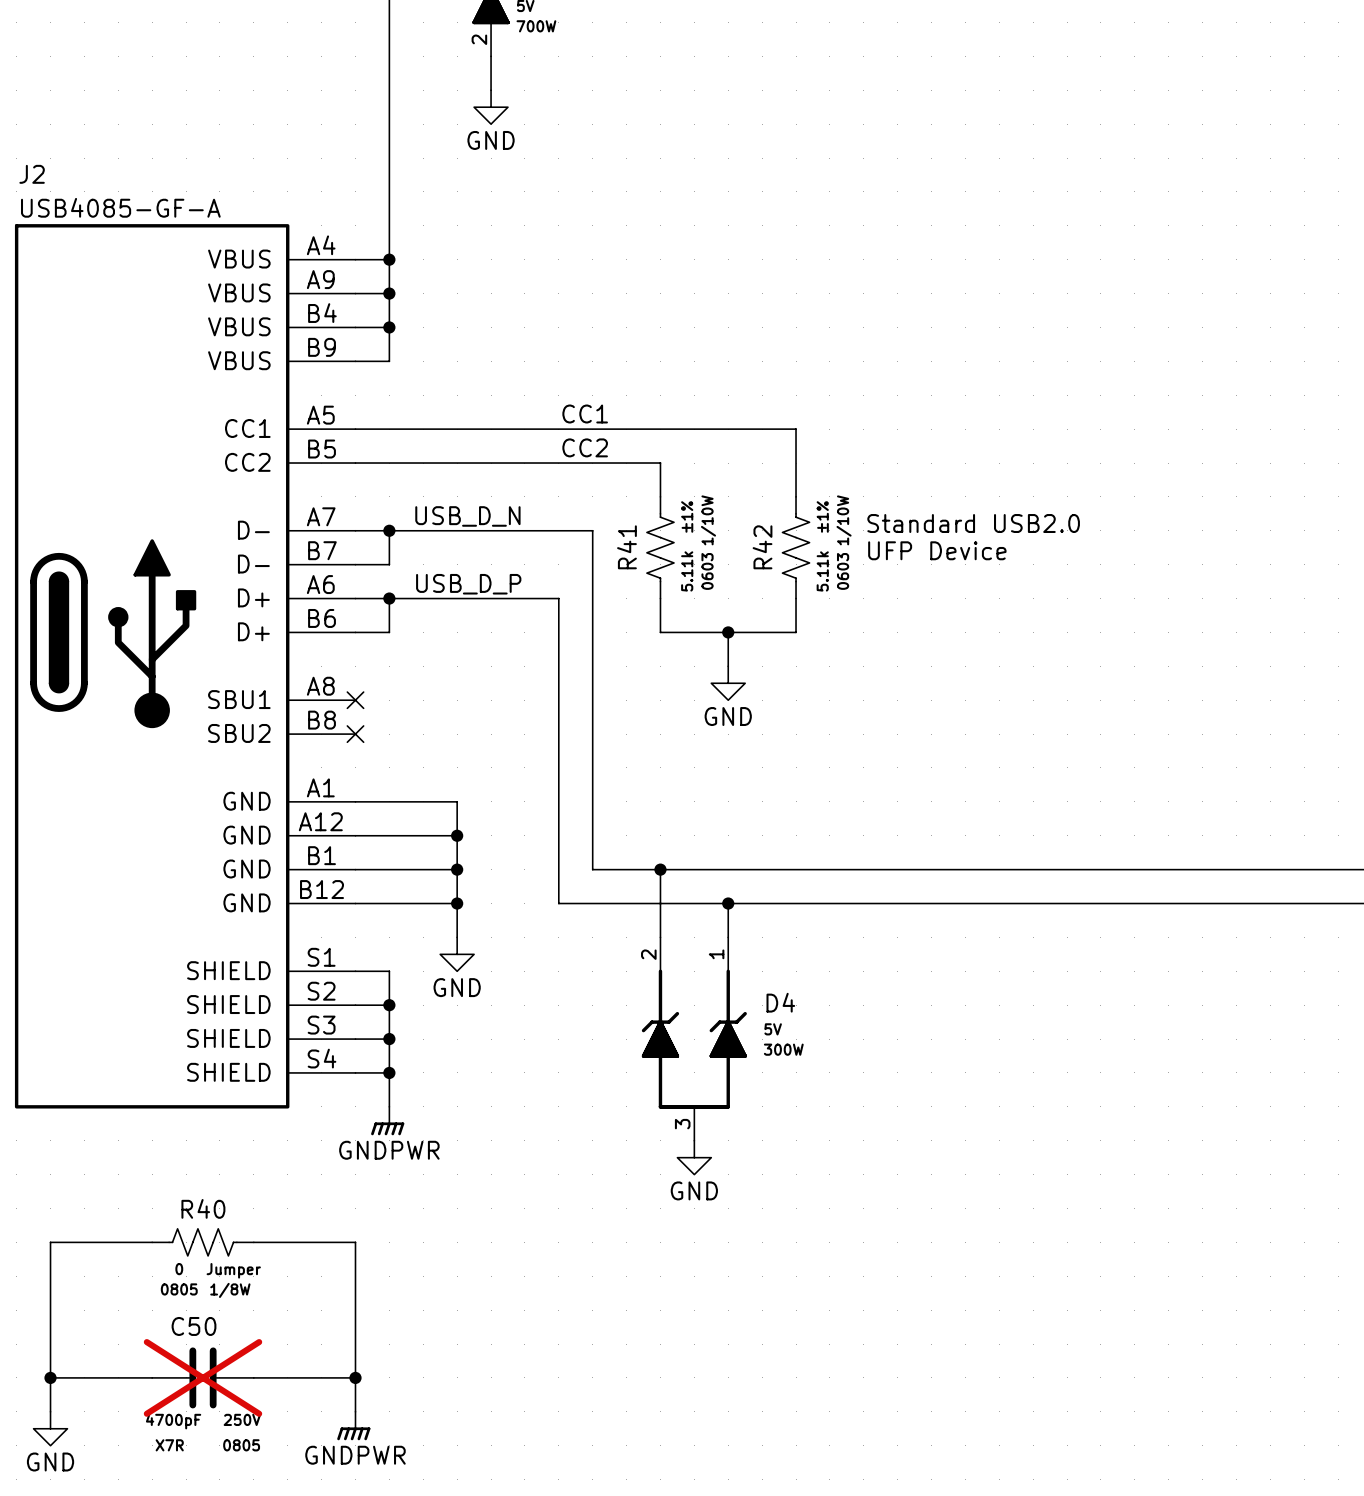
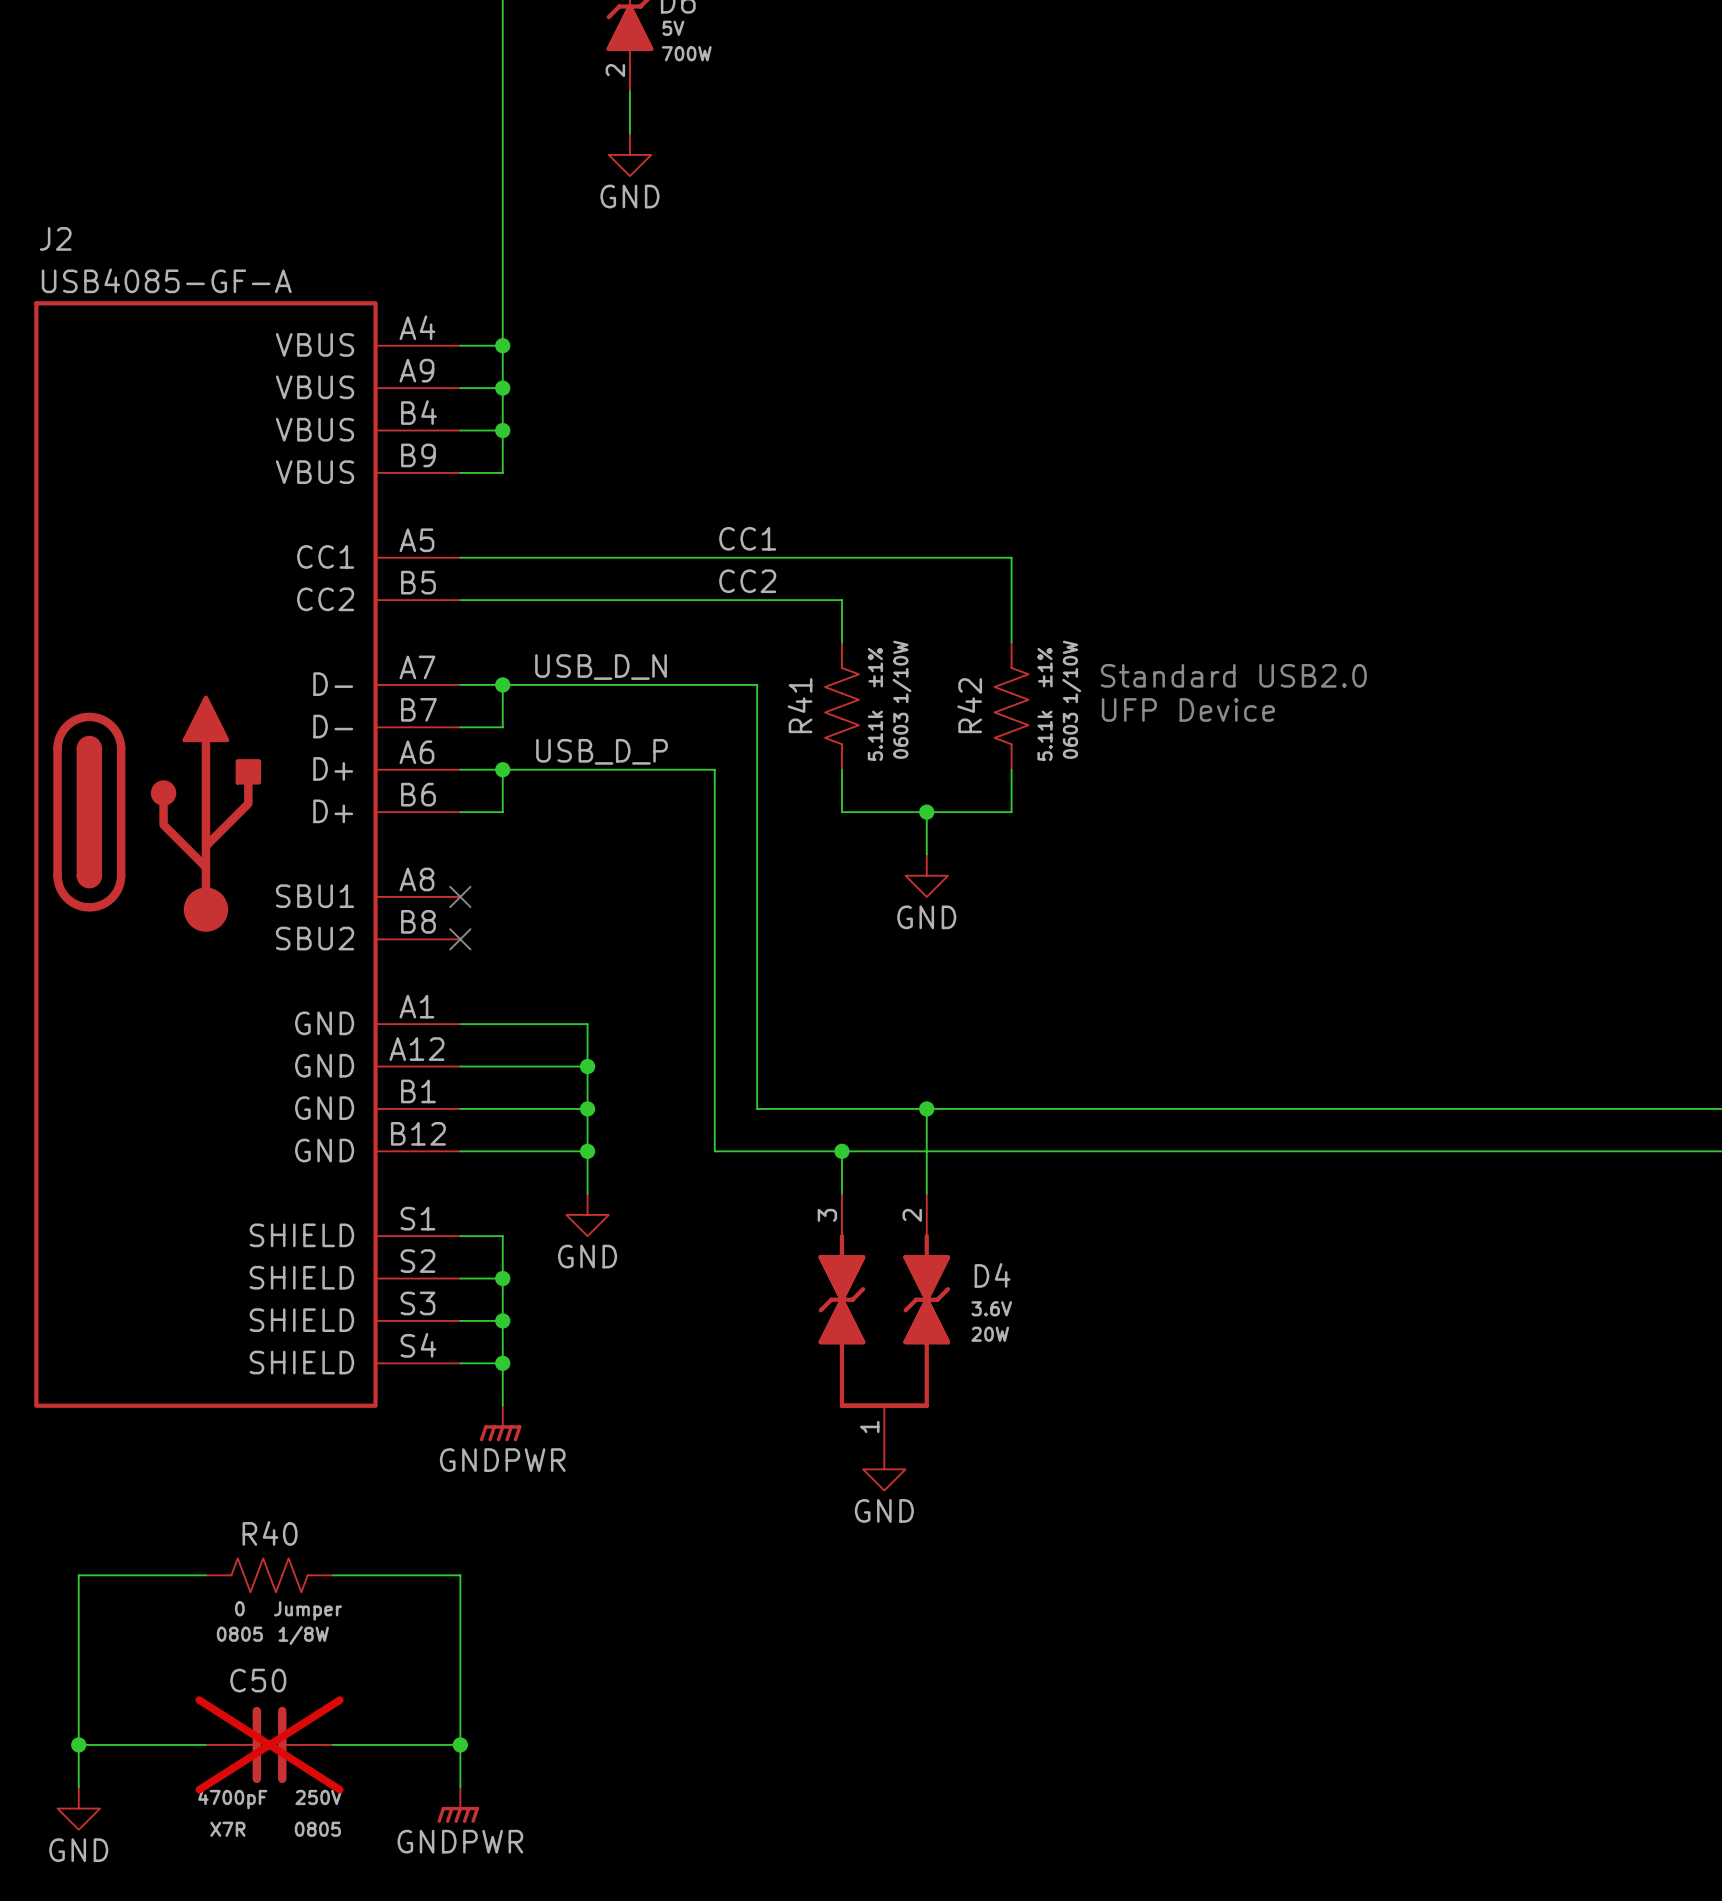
wire: (660, 869) (660, 903) -> (926, 1108) (926, 1151)
junction: (660, 869) -> none
junction: none -> (926, 1108)
junction: none -> (841, 1151)
junction: (728, 903) -> none
D4 symbol: [641, 937, 747, 1141] -> [818, 1193, 951, 1449]
D4 text: 5V (773, 1029) -> 3.6V (991, 1308)
D4 text: 300W (783, 1049) -> 20W (990, 1334)

